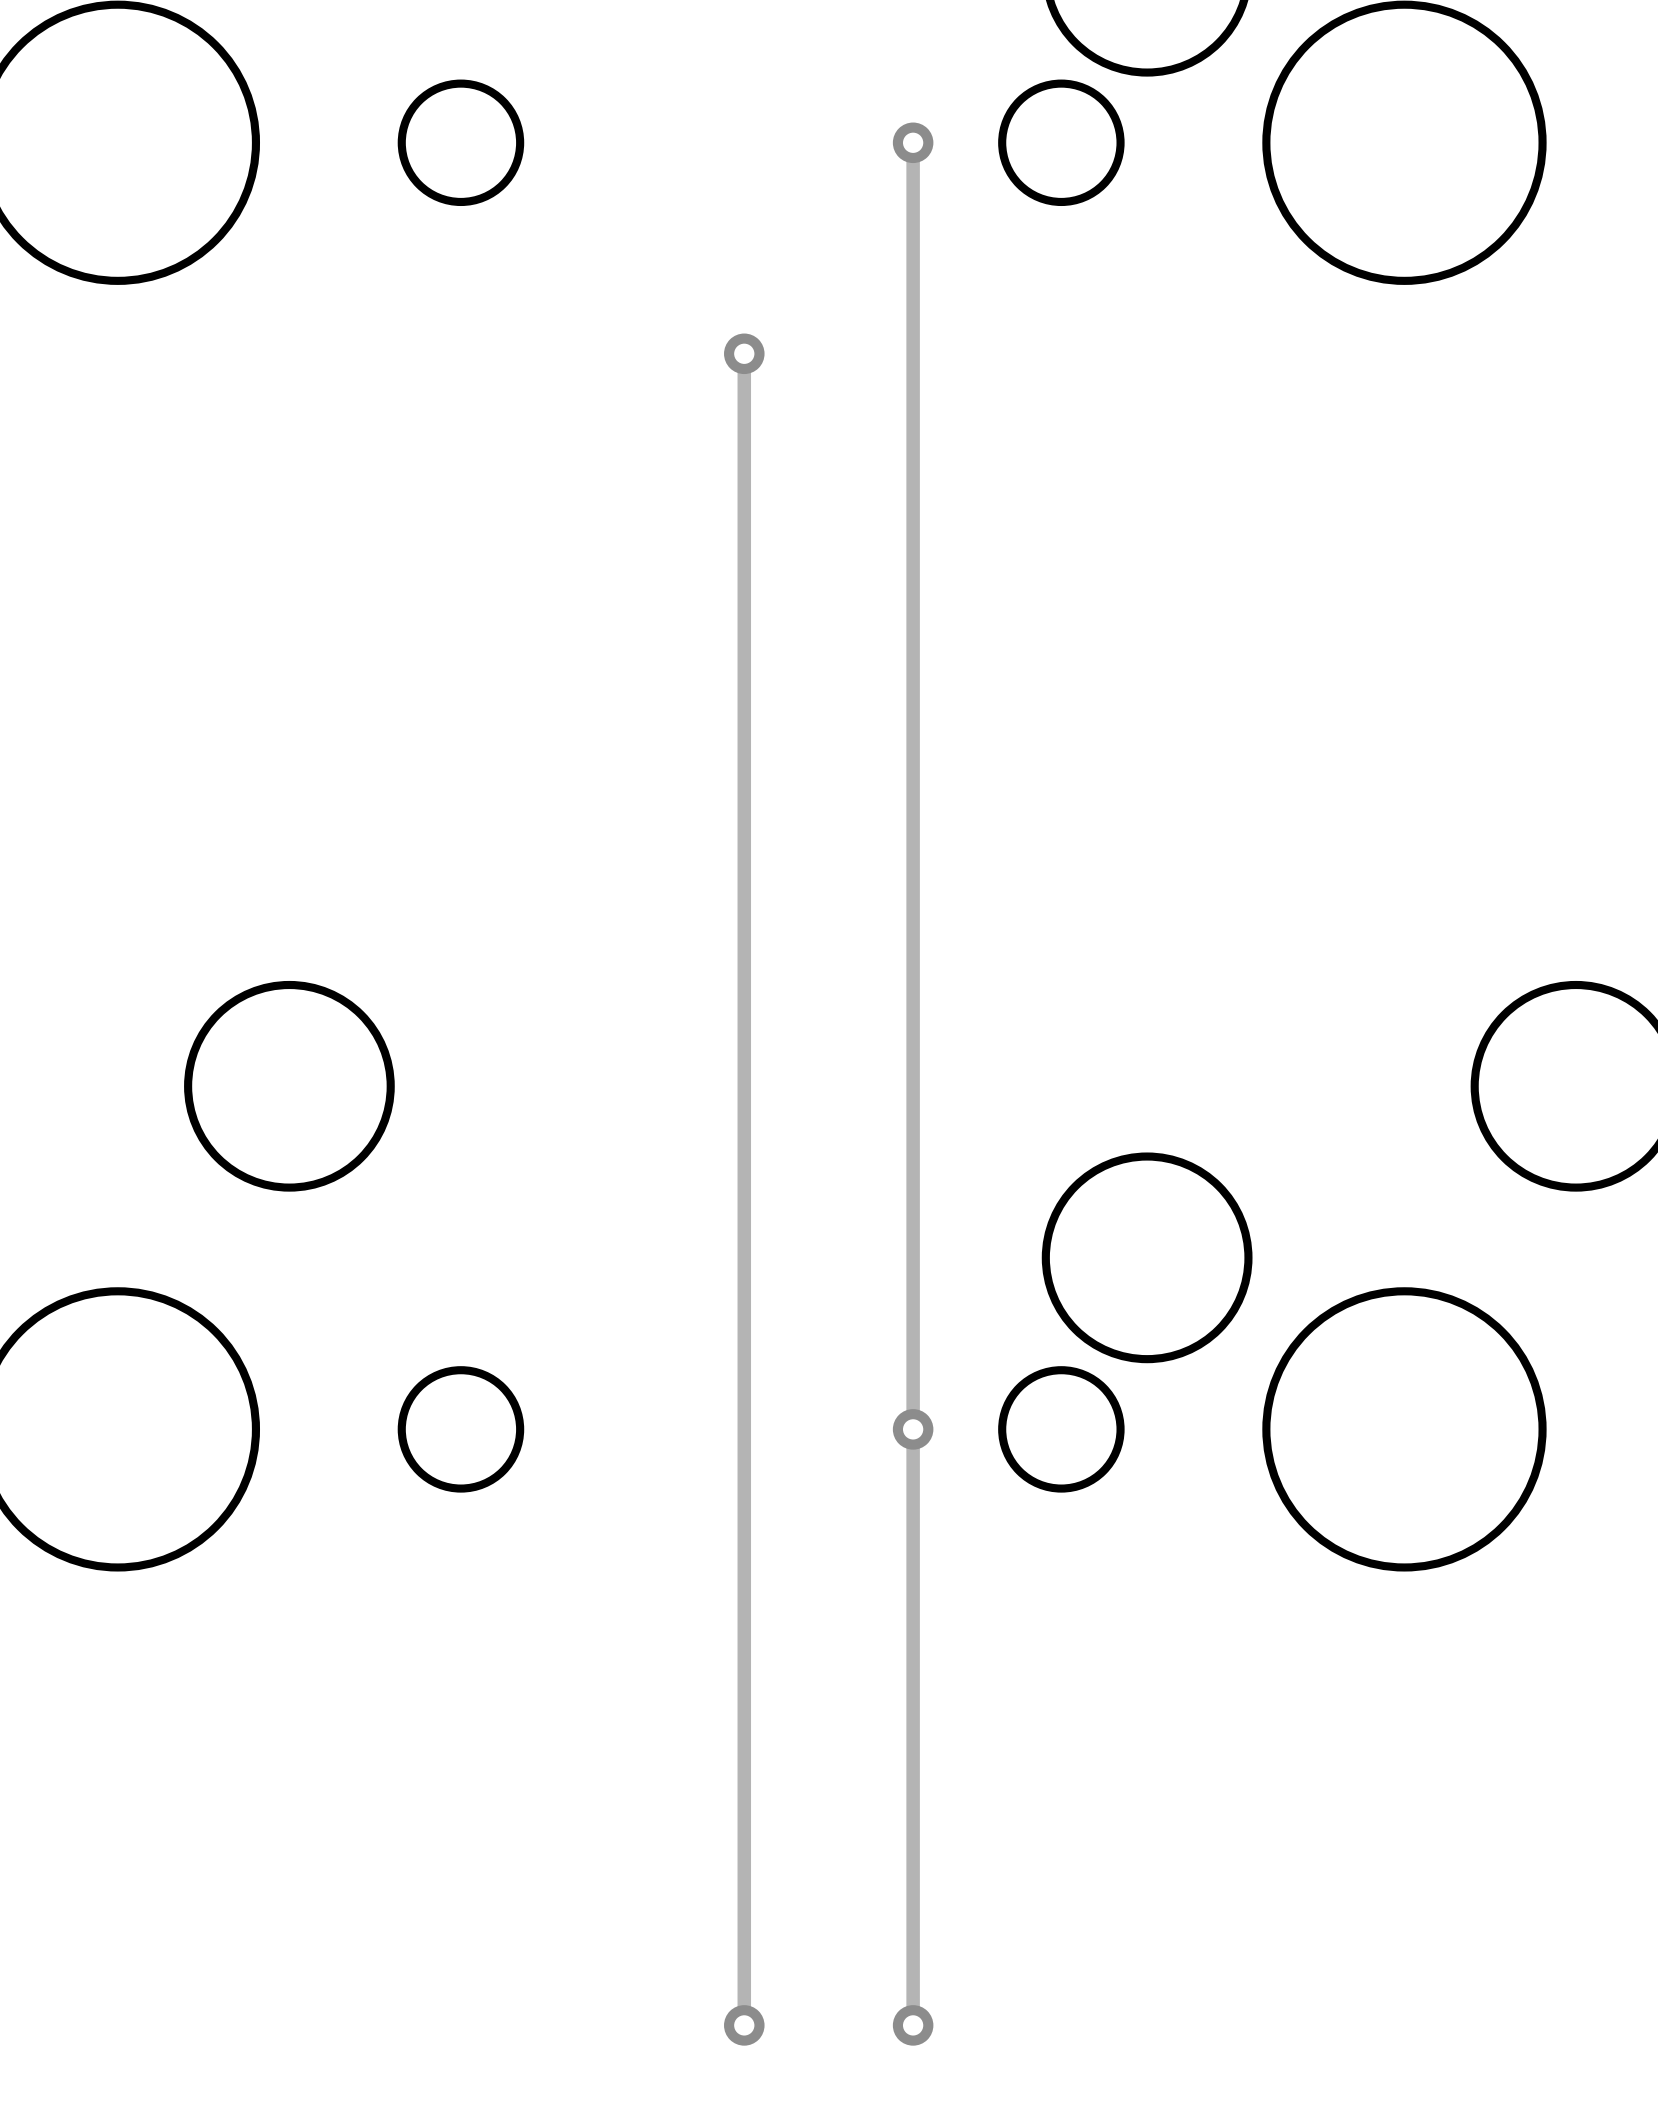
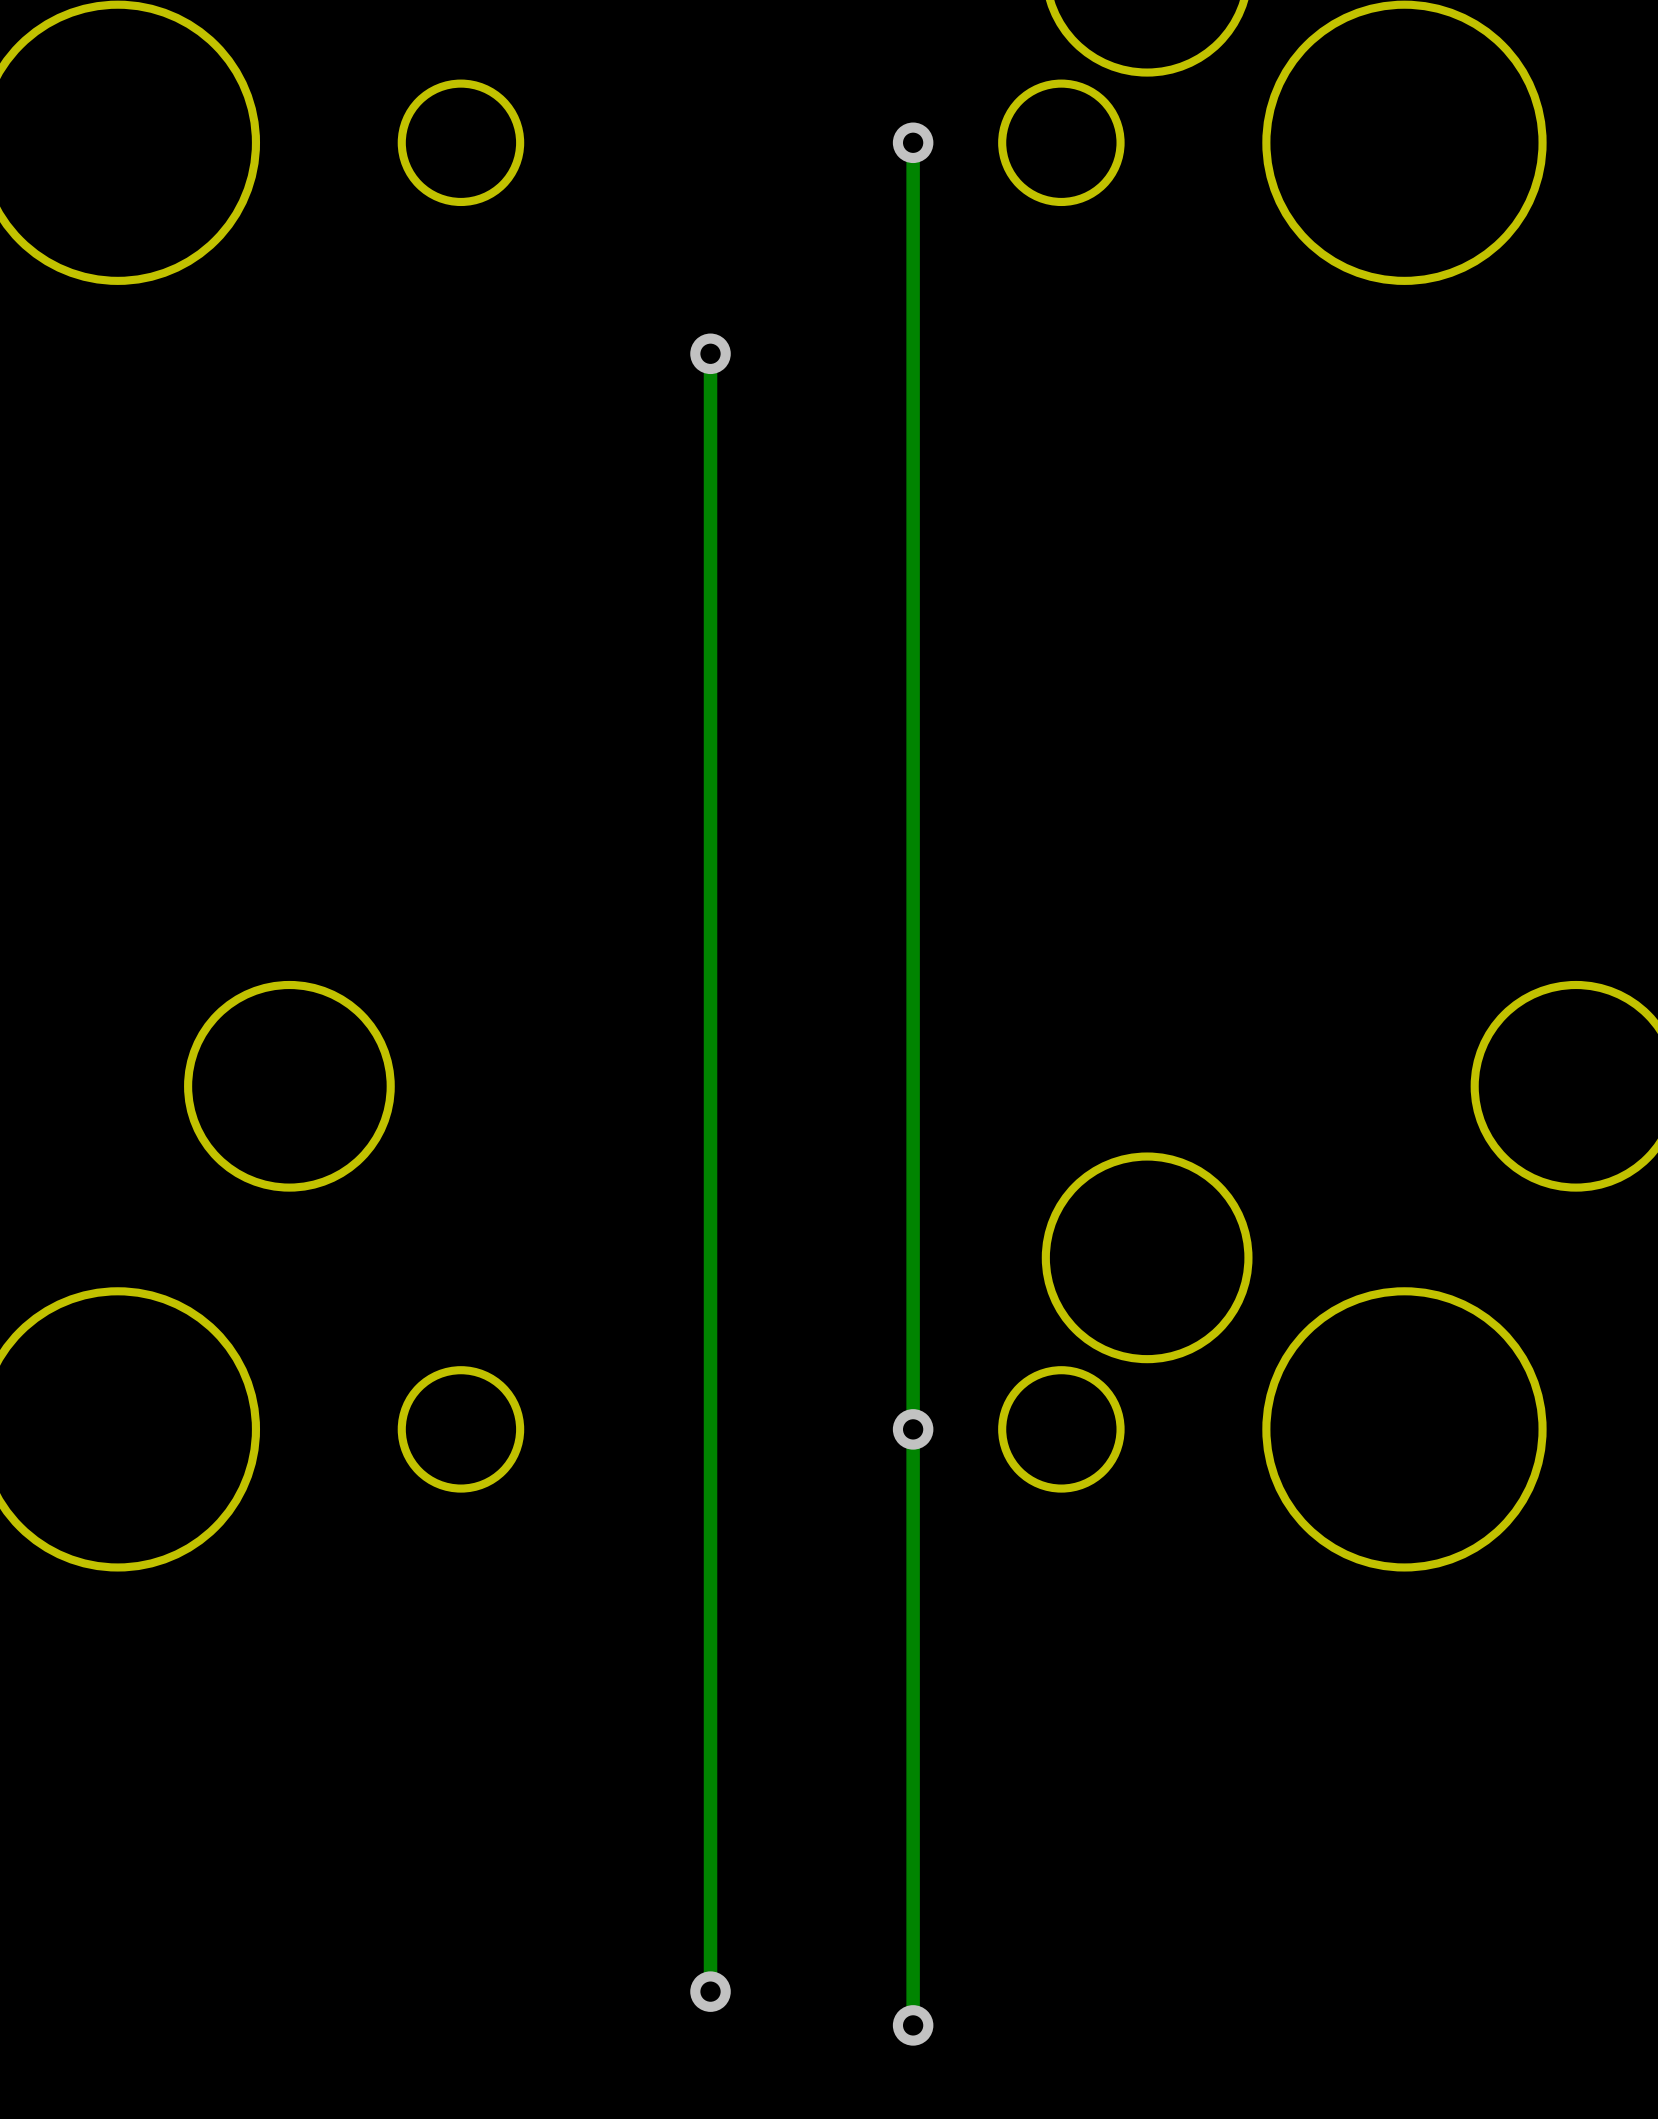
track: none -> (710, 353) (710, 1991)
track: (744, 353) (744, 2025) -> none
via position: (744, 353) -> (710, 353)
via position: (744, 2025) -> (710, 1991)

